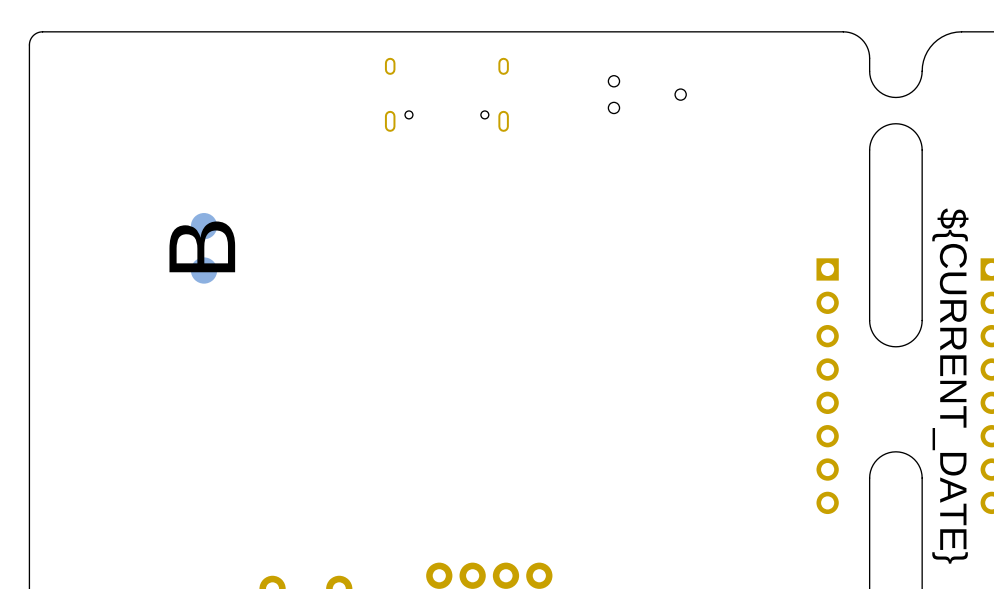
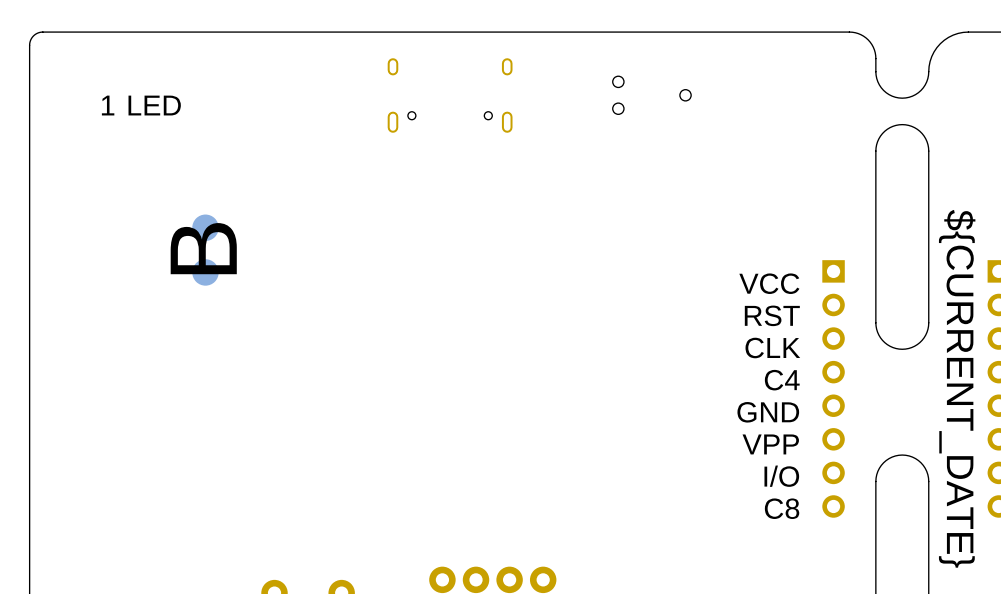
text: none -> 1 (108, 105)
text: none -> LED (154, 105)
text: none -> VCC (769, 283)
text: none -> RST (772, 315)
text: none -> CLK (772, 348)
text: none -> C4 (782, 380)
text: none -> GND (768, 412)
text: none -> VPP (770, 444)
text: none -> I/O (781, 476)
text: none -> C8 (782, 508)

